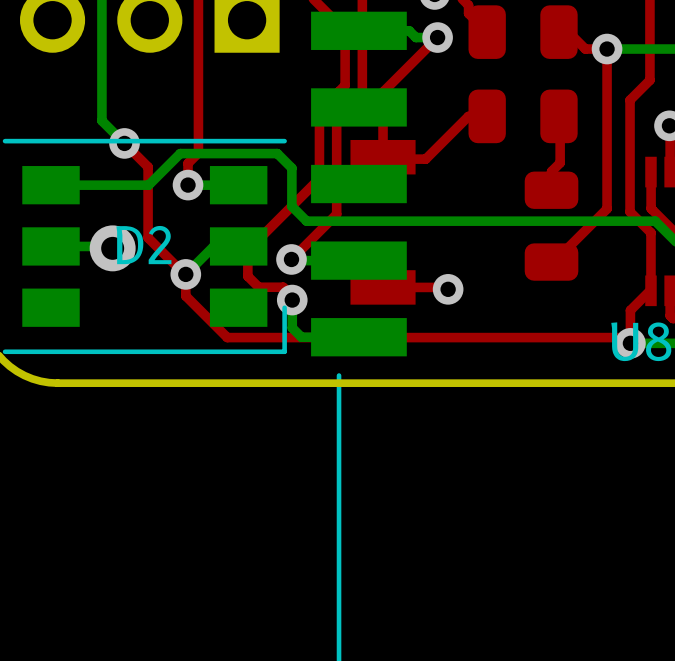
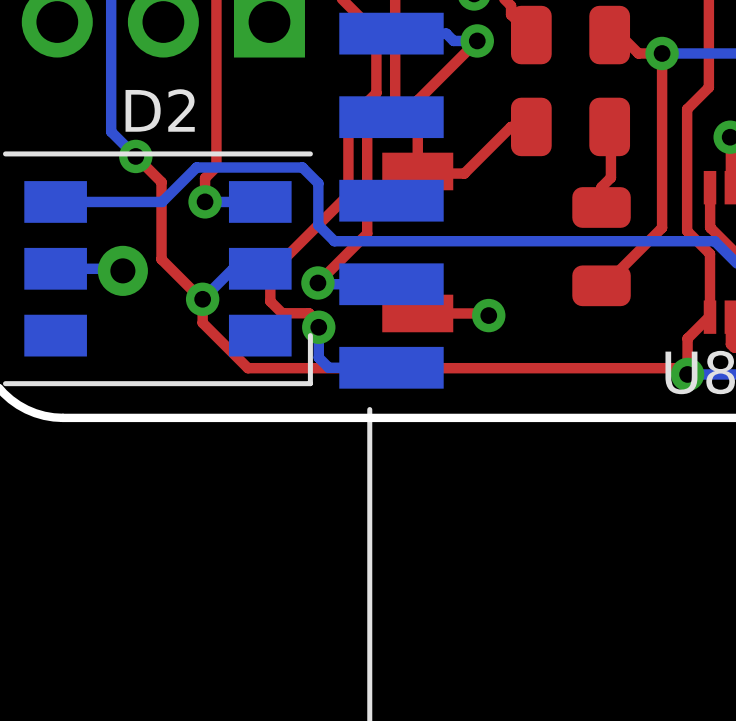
D2 name position: D2 (143, 245) -> D2 (160, 110)

